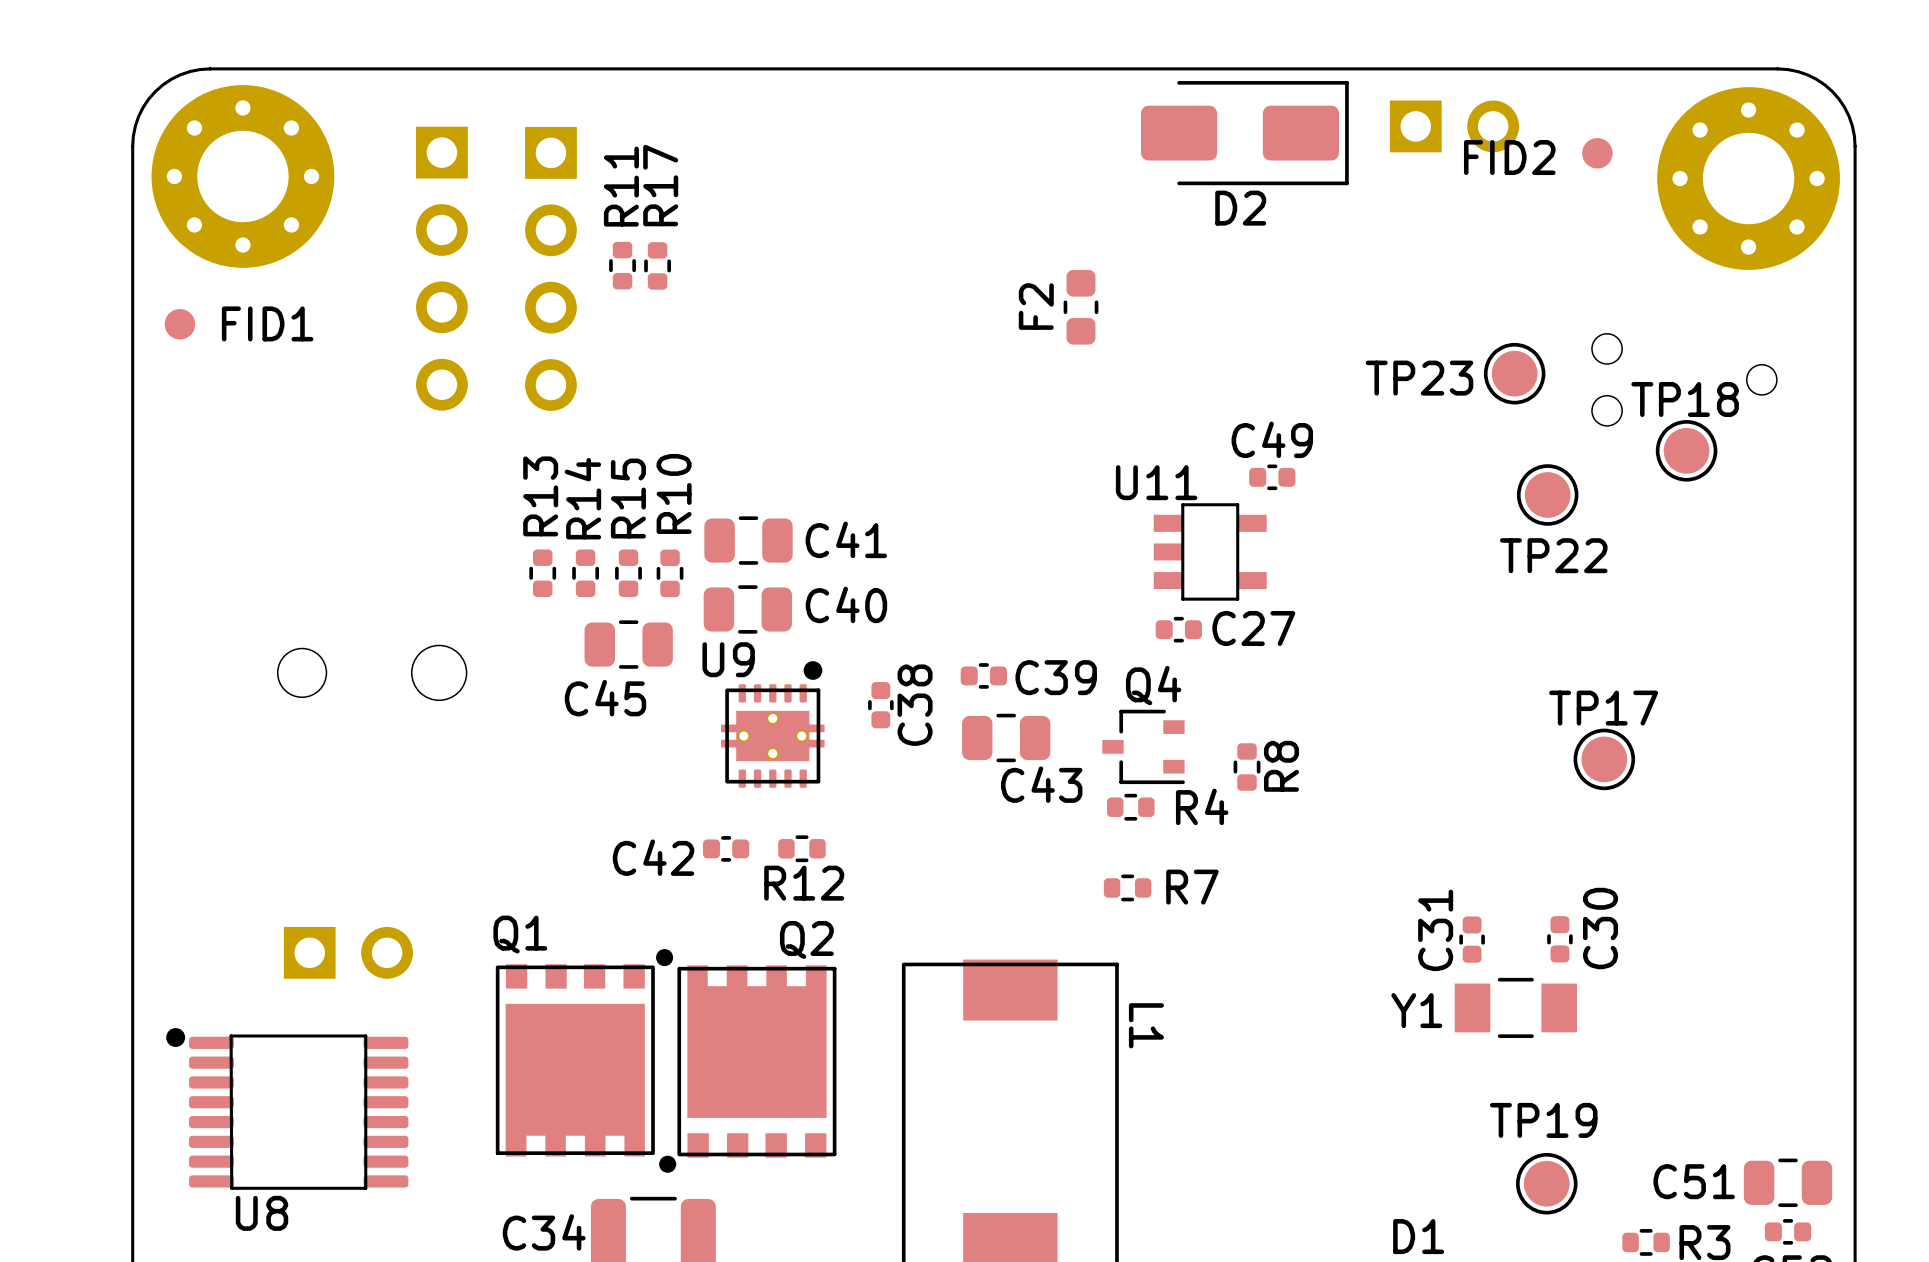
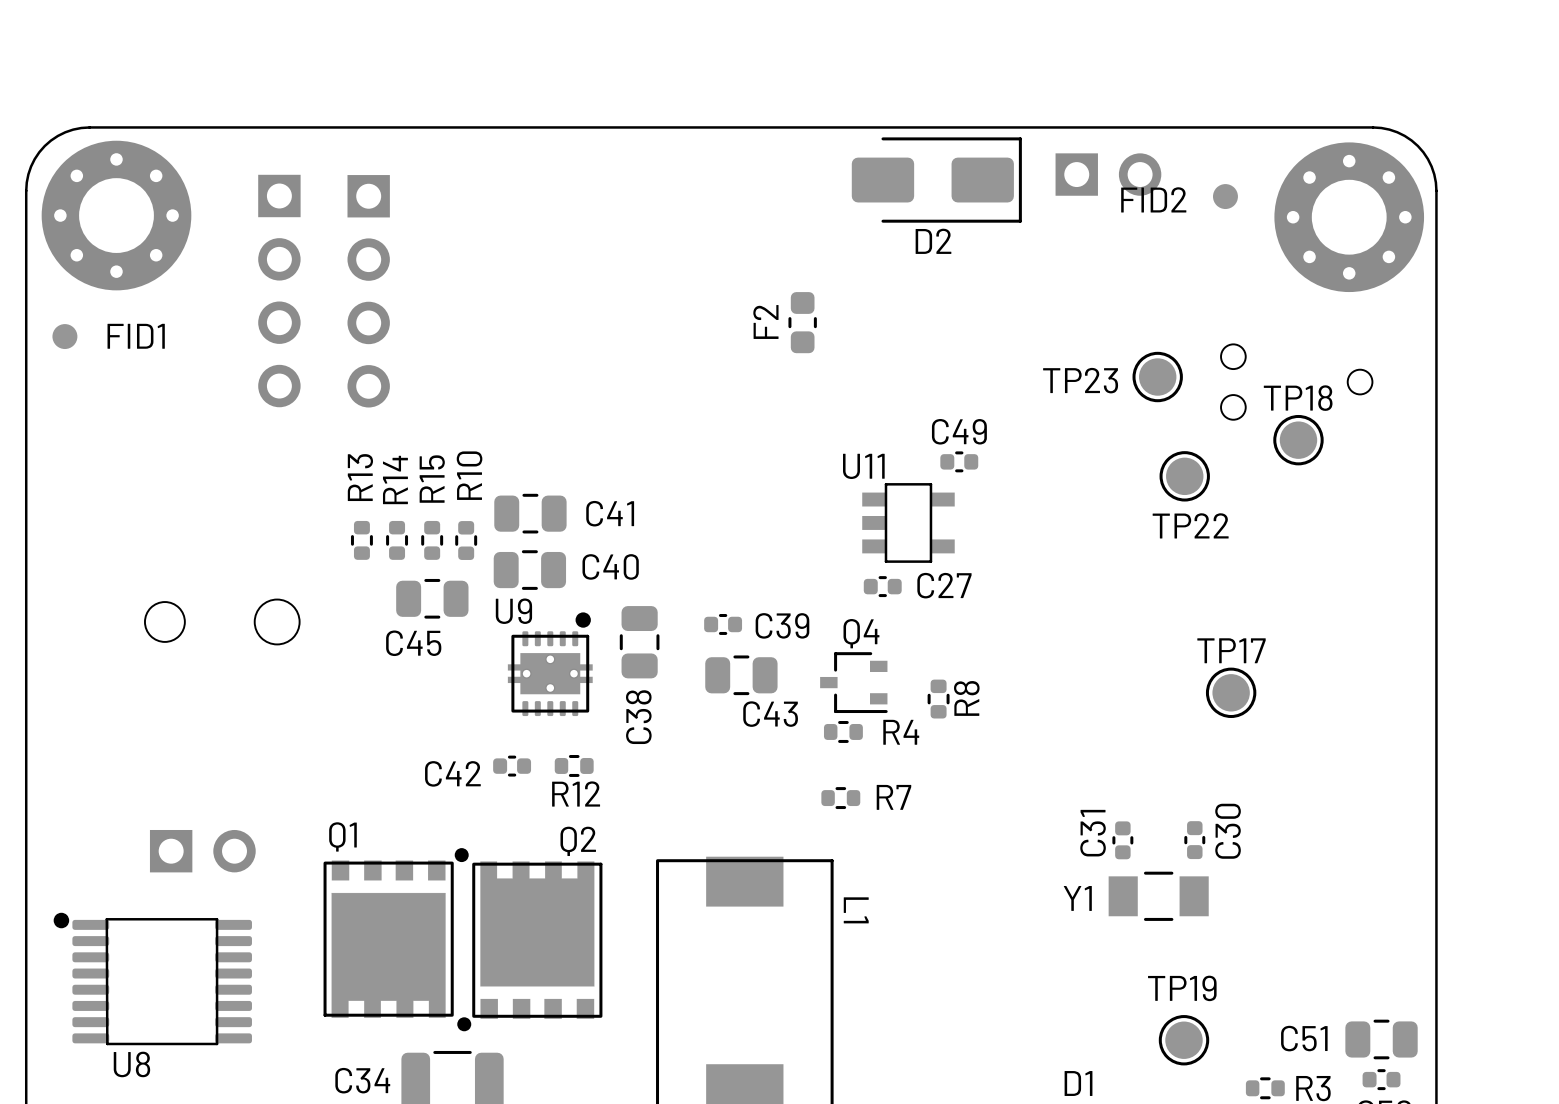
R11: (622, 265) -> none
R17: (657, 265) -> none
C38 footprint: [868, 682, 894, 729] -> [619, 606, 660, 679]
C38 name position: C38 (915, 705) -> C38 (638, 717)

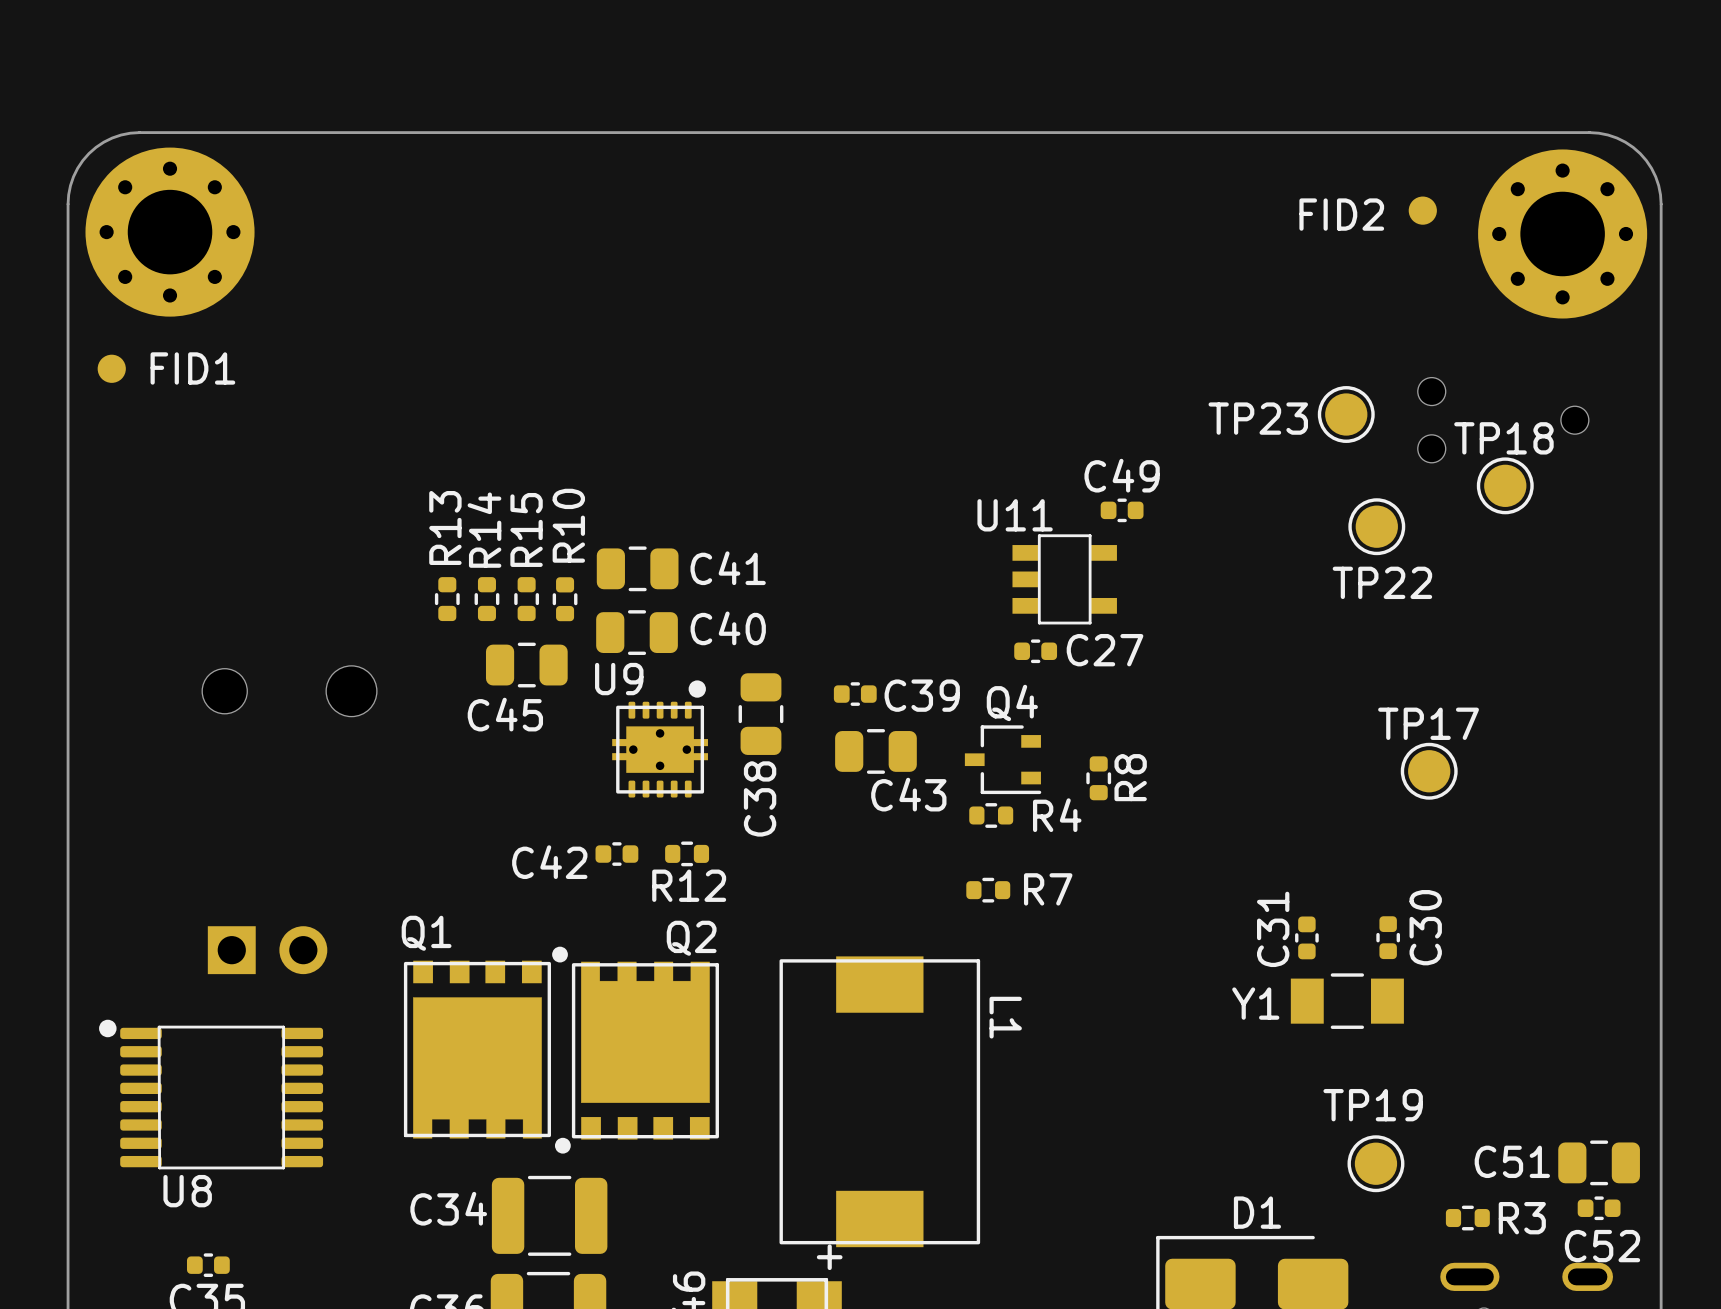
part: (1108, 174) -> none
D2: (936, 180) -> none
part: (279, 291) -> none
part: (368, 291) -> none
F2: (802, 322) -> none

